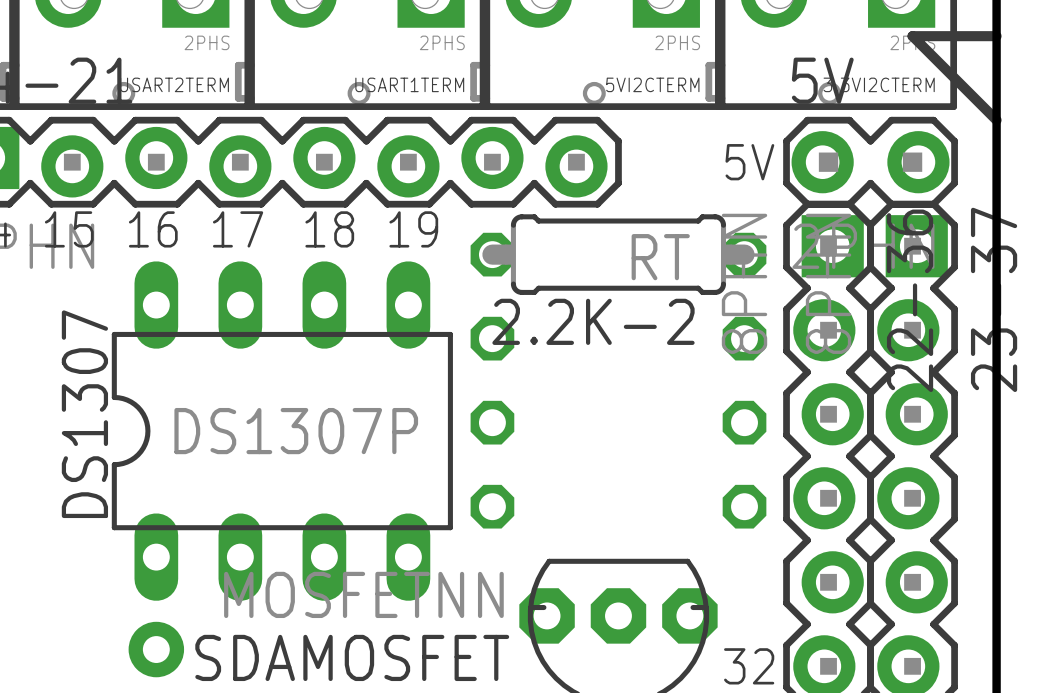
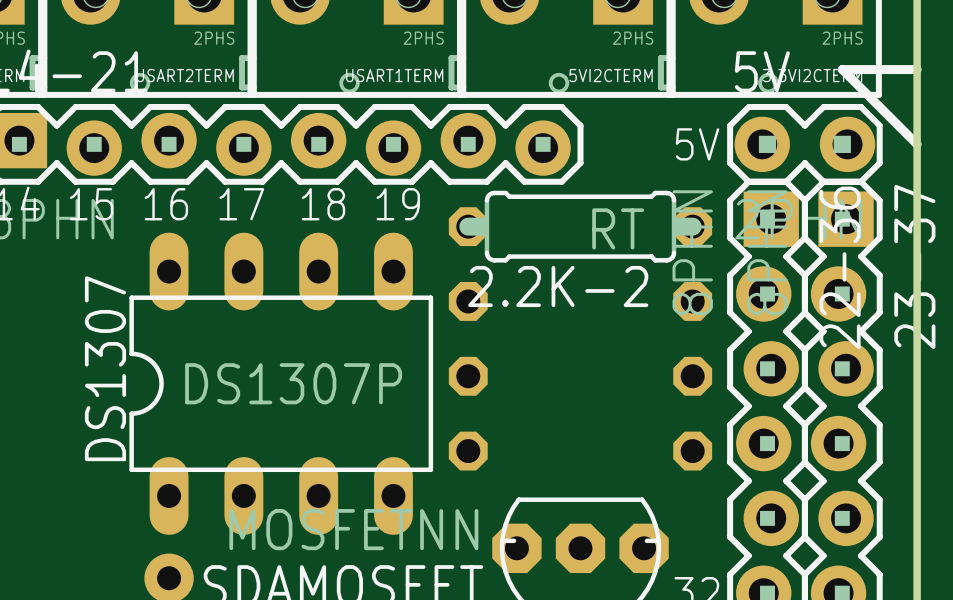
line: (996, 36) (912, 36) (996, 120) -> (917, 69) (842, 69) (917, 144)

